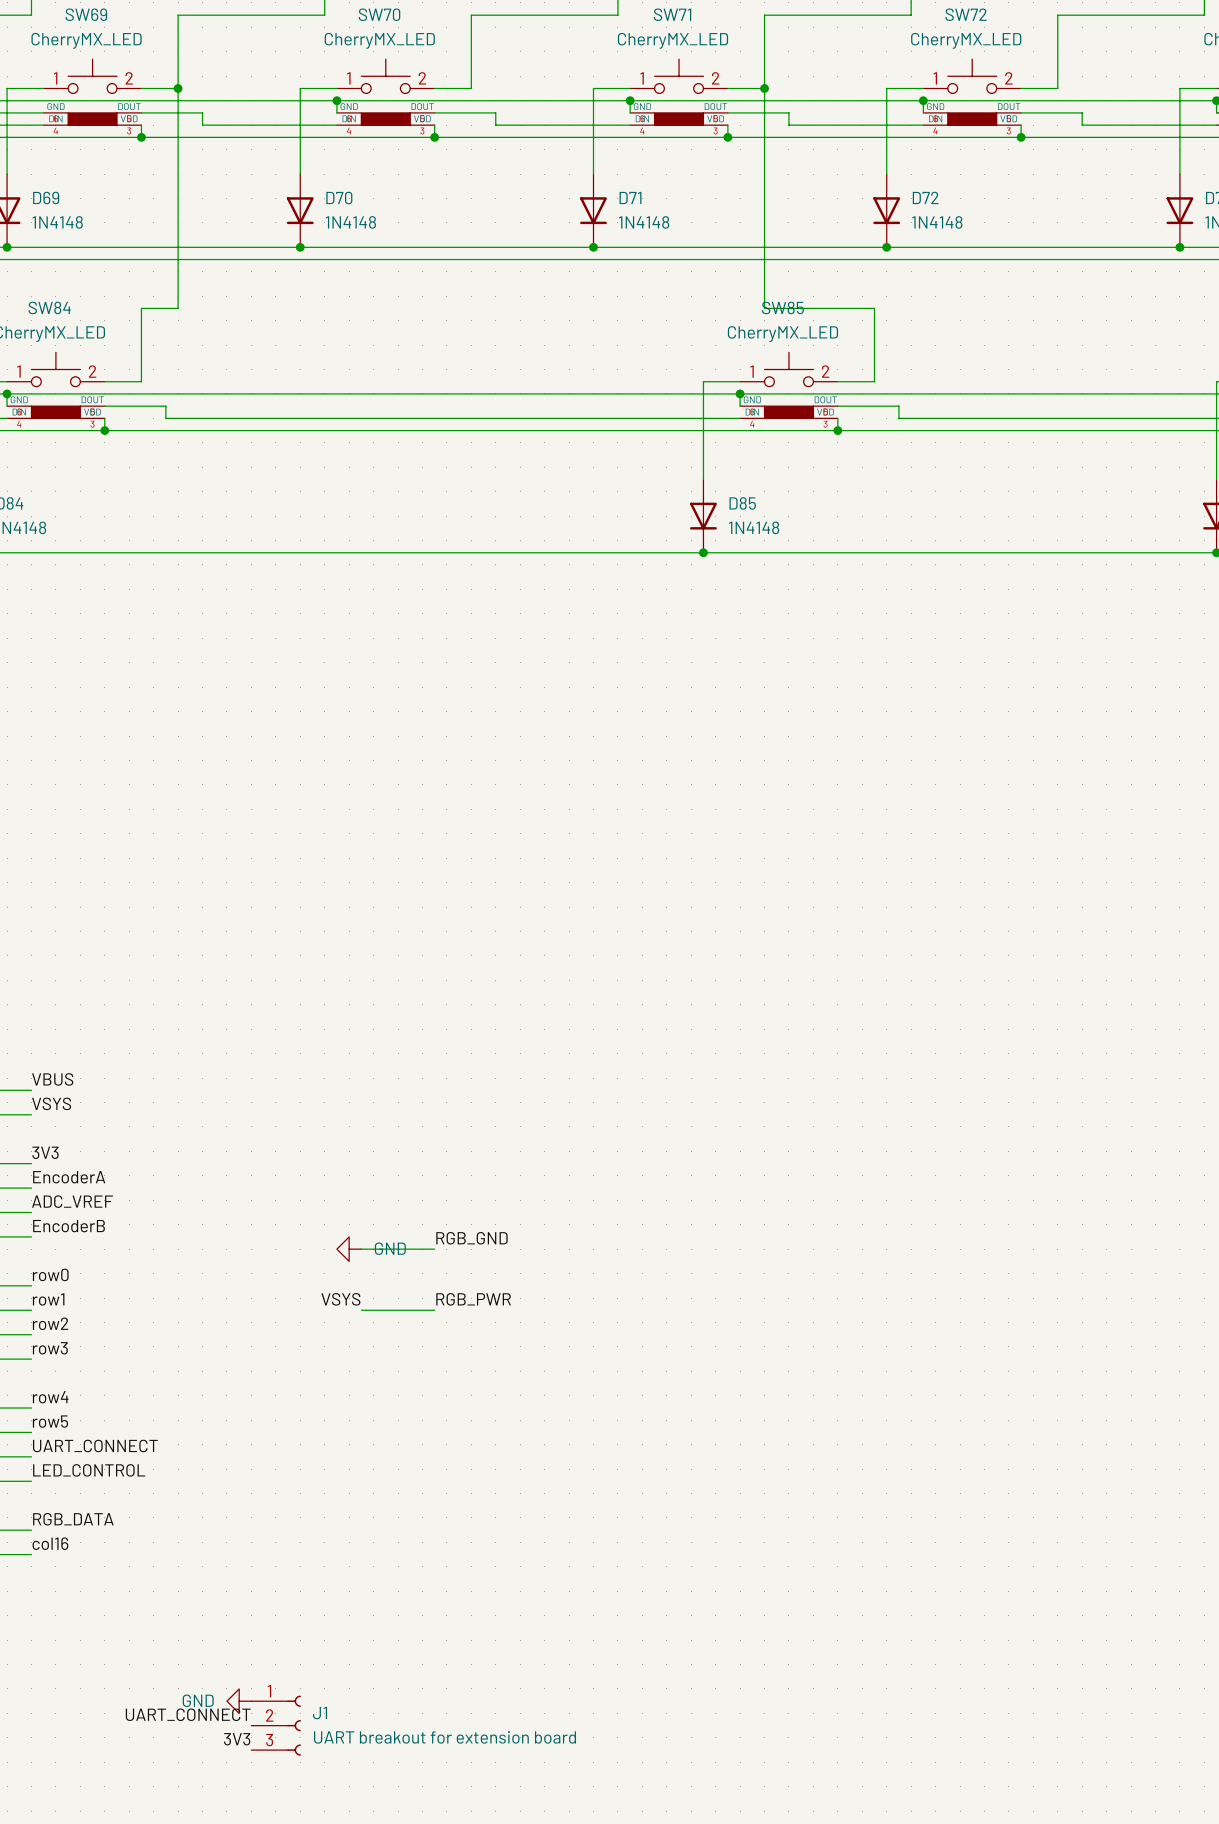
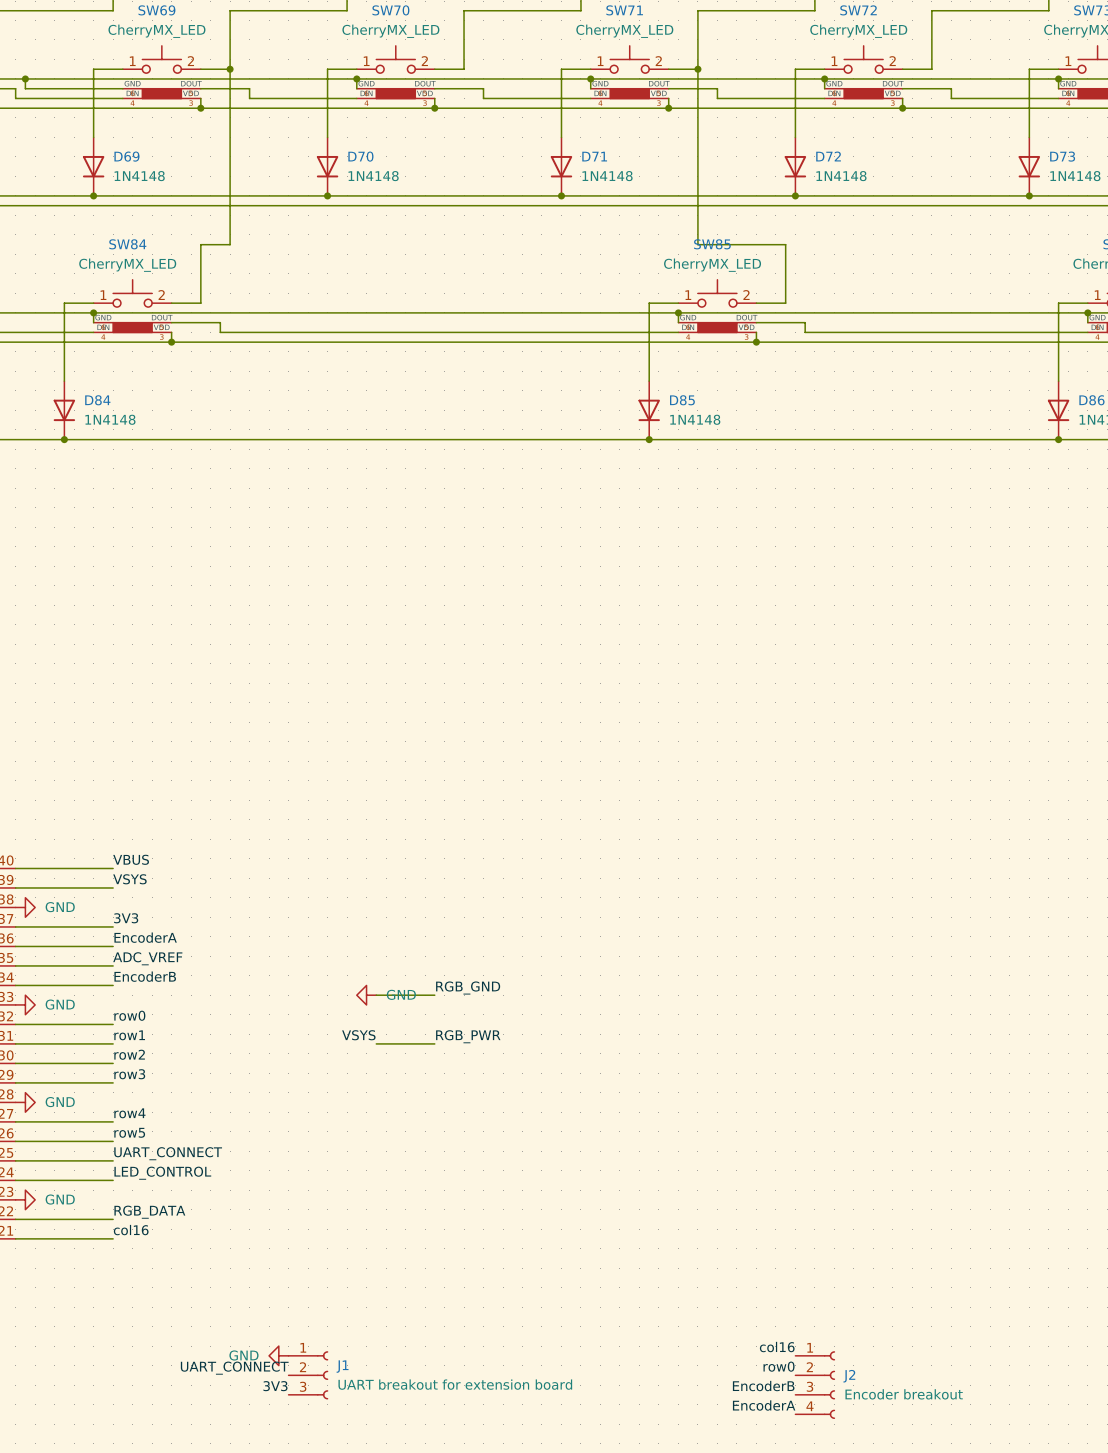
label: none -> col16 (777, 1347)
label: none -> row0 (779, 1366)
J2: none -> Encoder breakout (815, 1385)
label: none -> EncoderB (763, 1386)
label: none -> EncoderA (764, 1405)

